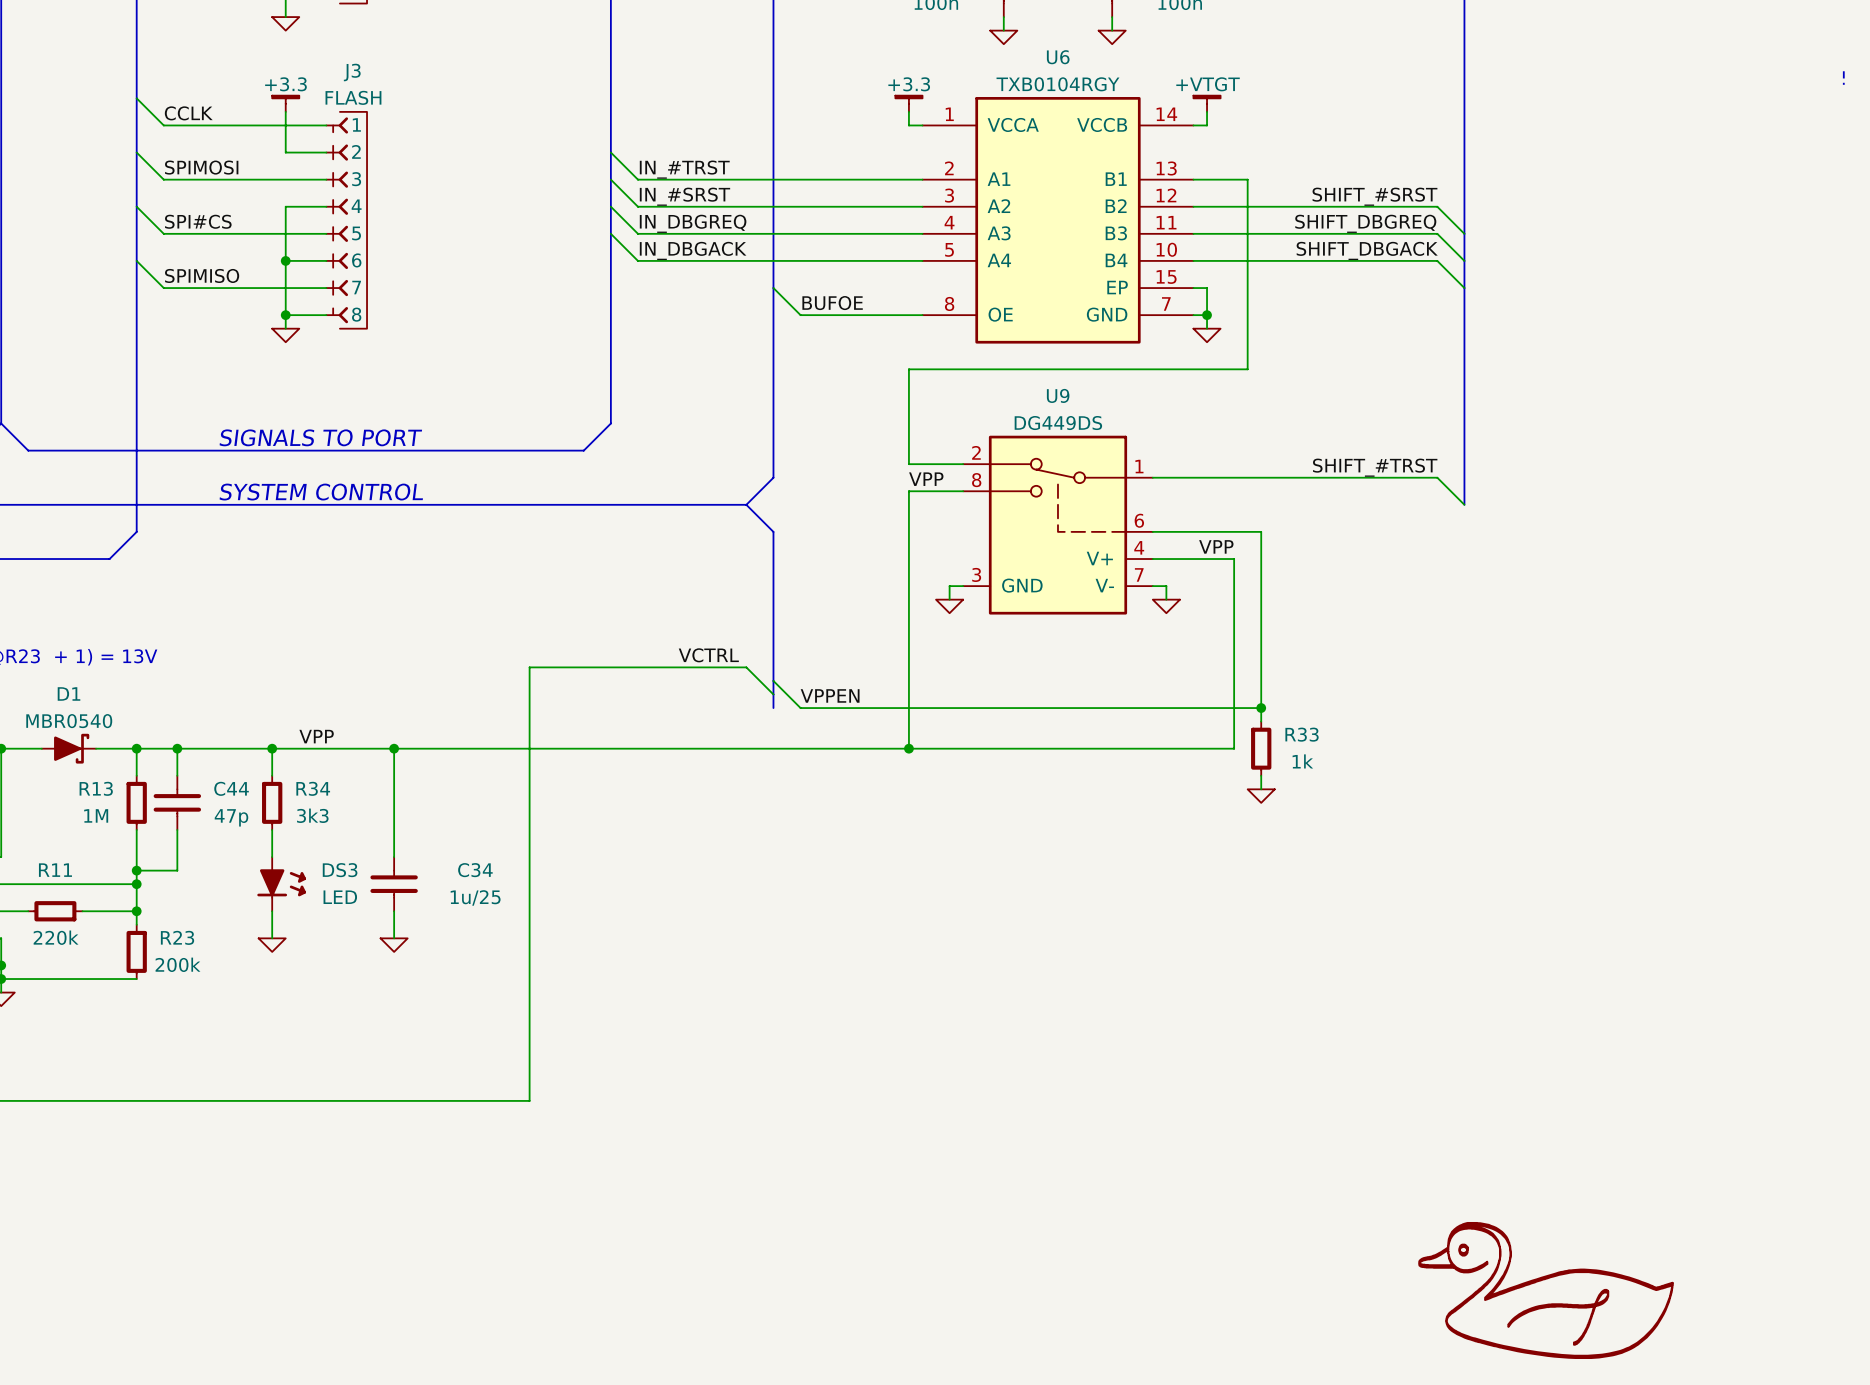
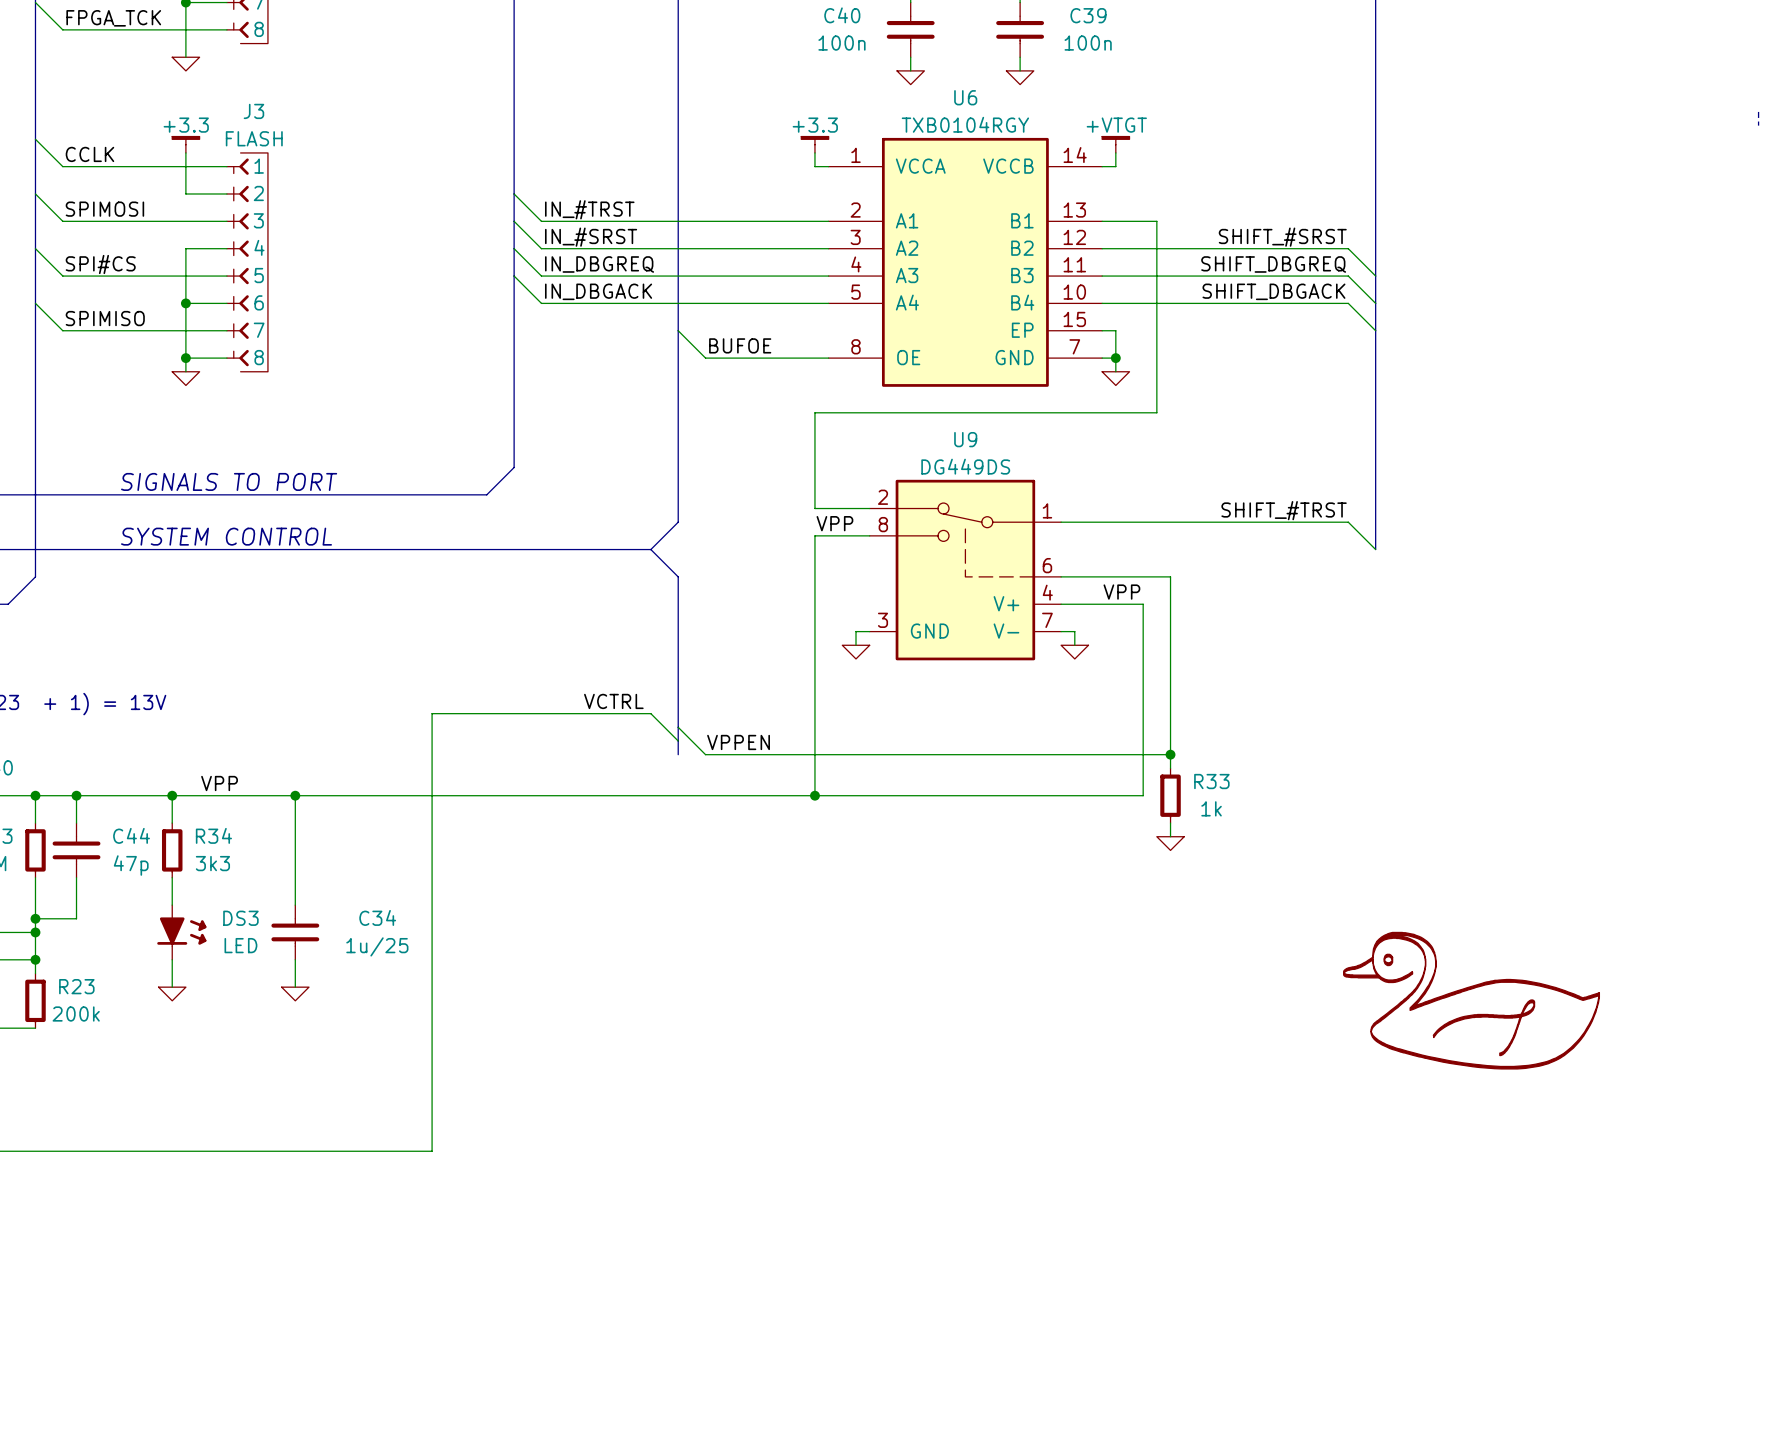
power symbol: none -> (1471, 1000)
power symbol: (1545, 1290) -> none

